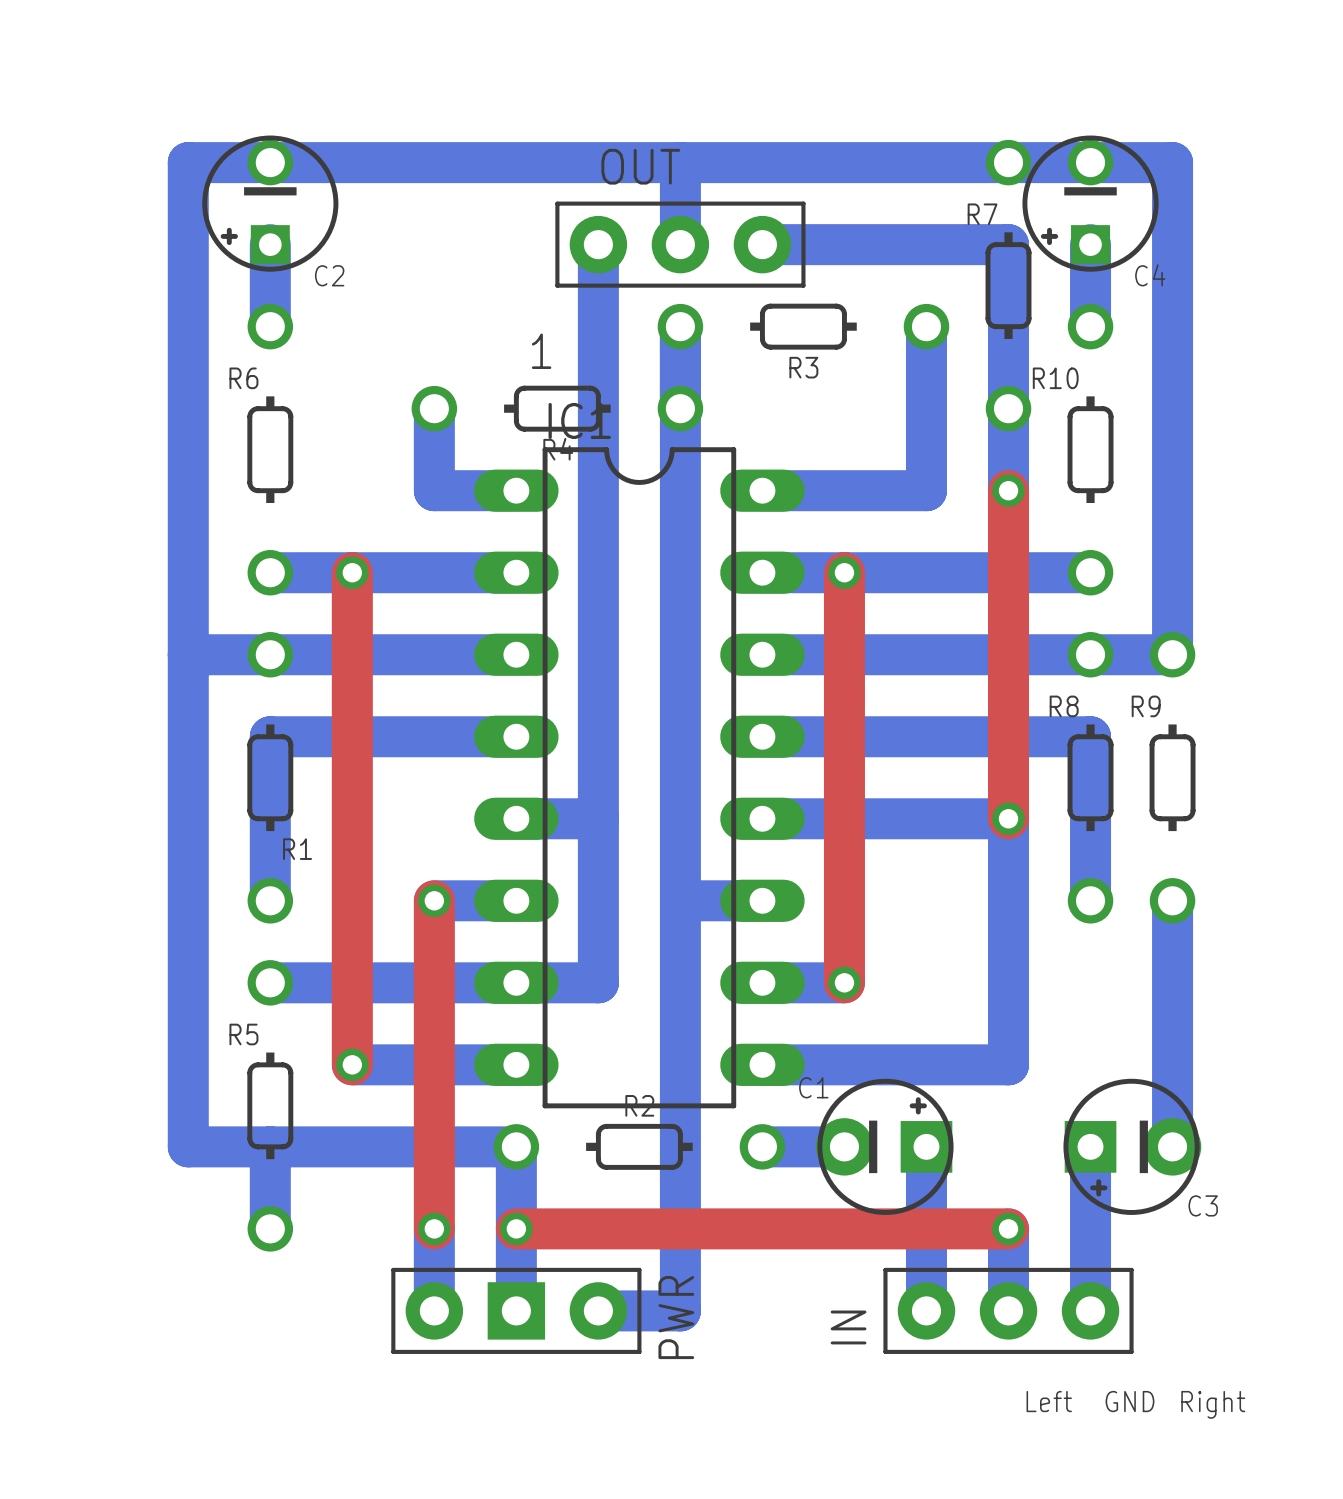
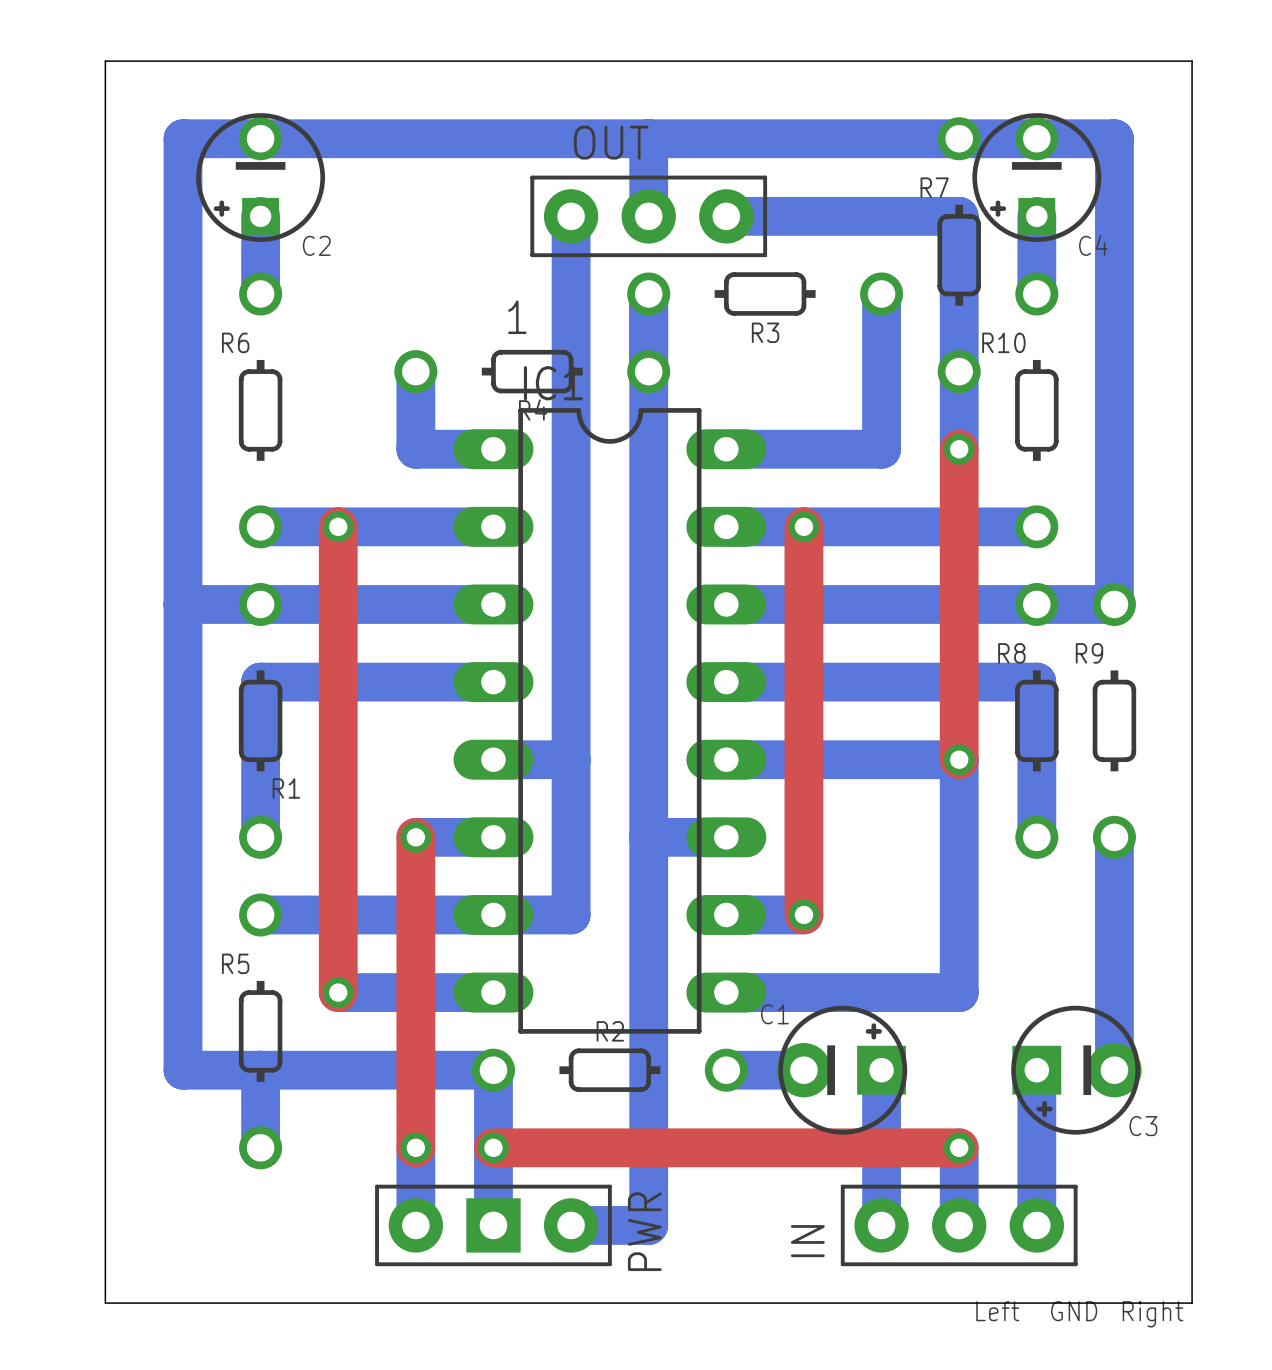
board edge: none -> (105, 61) (1192, 61) (1192, 1303) (105, 1303) (105, 61)

